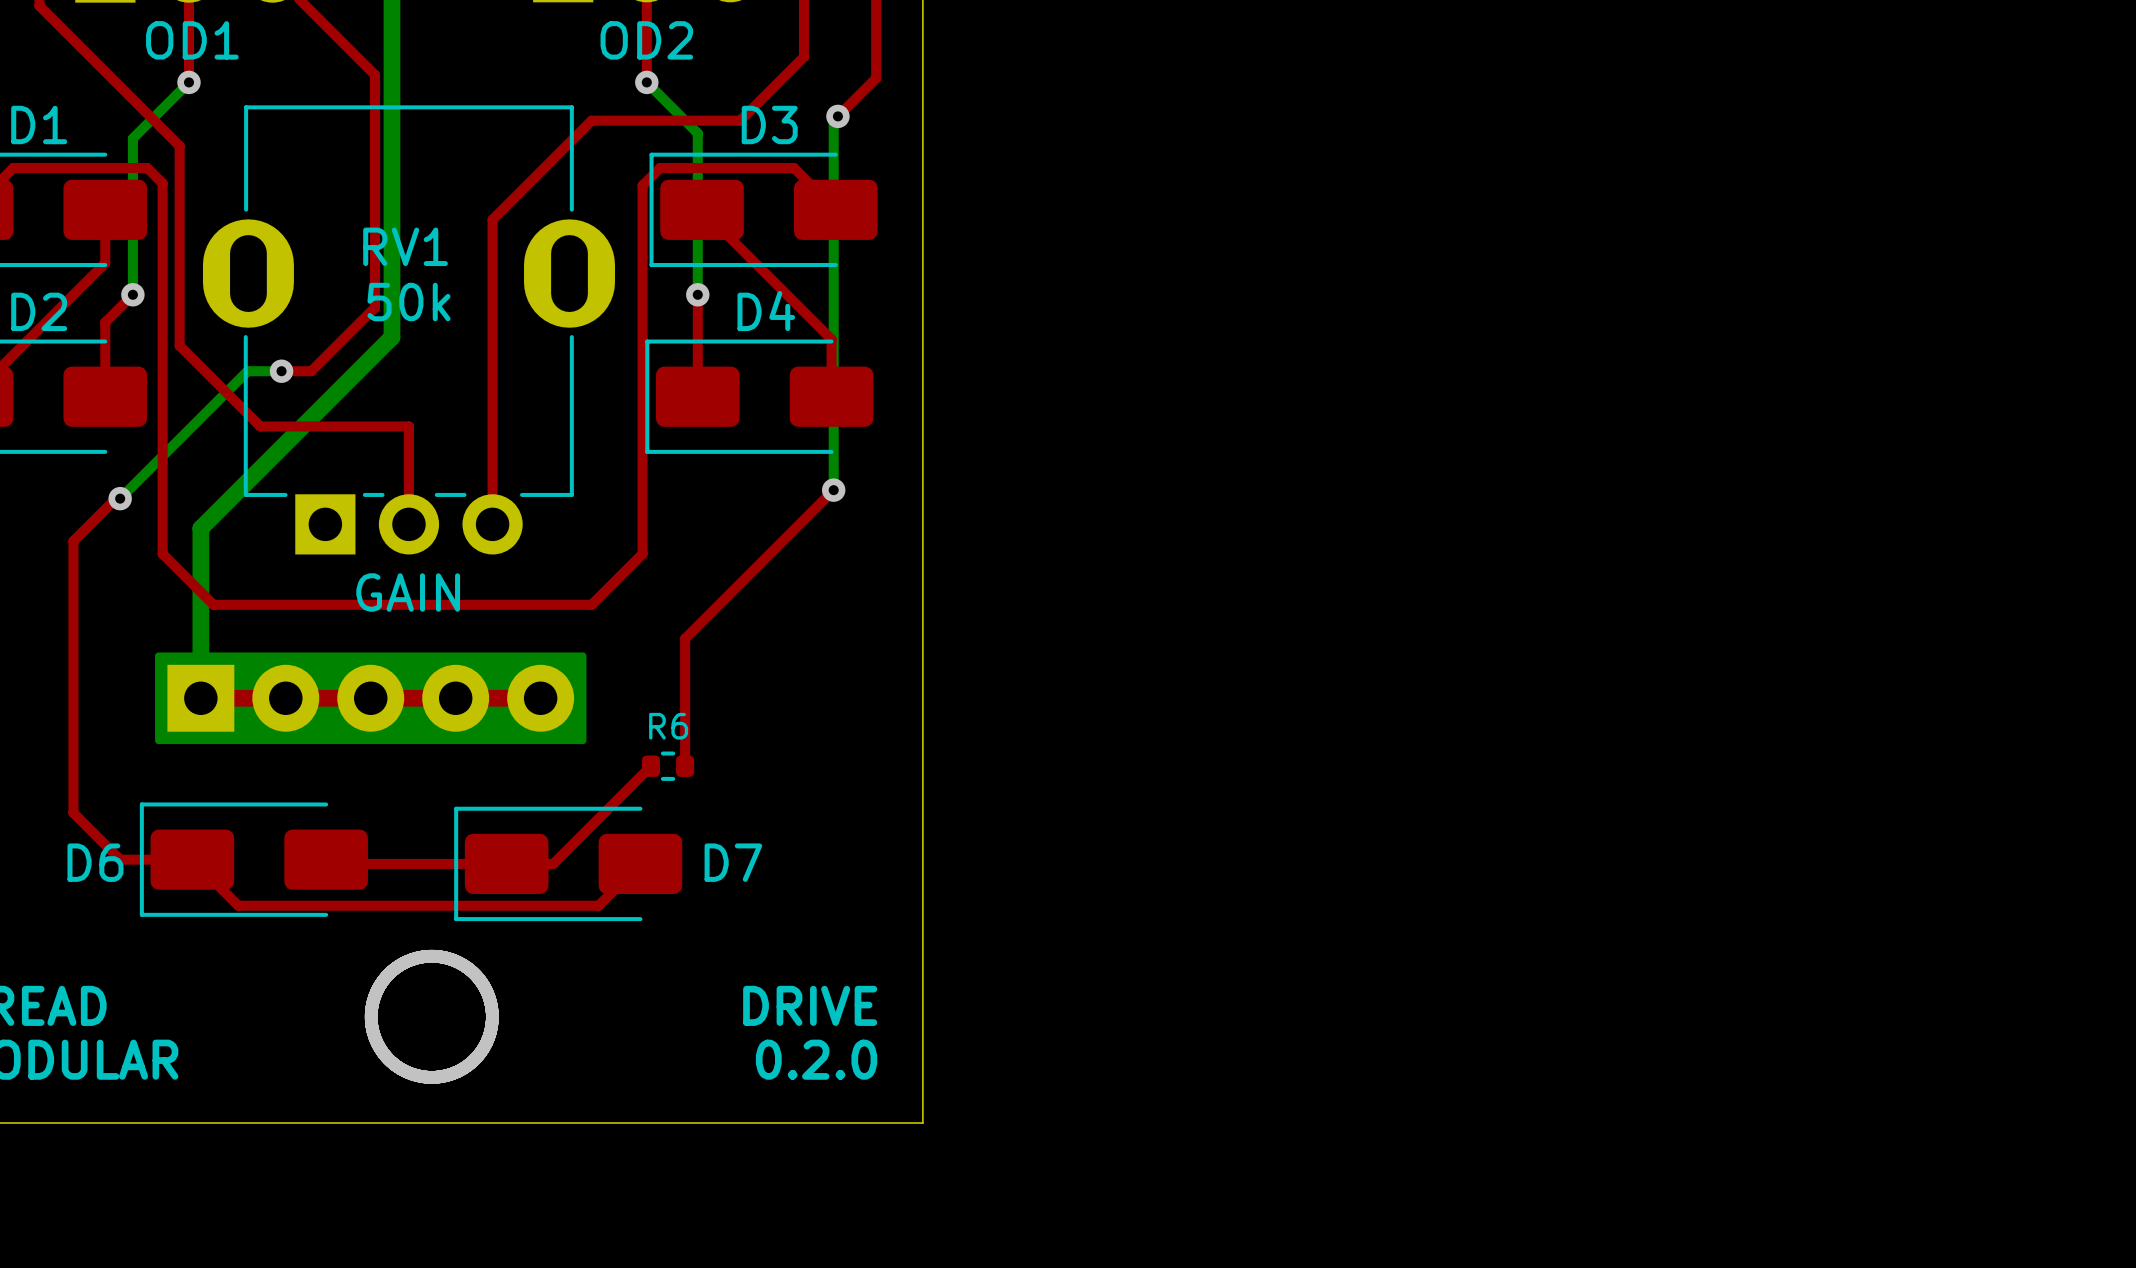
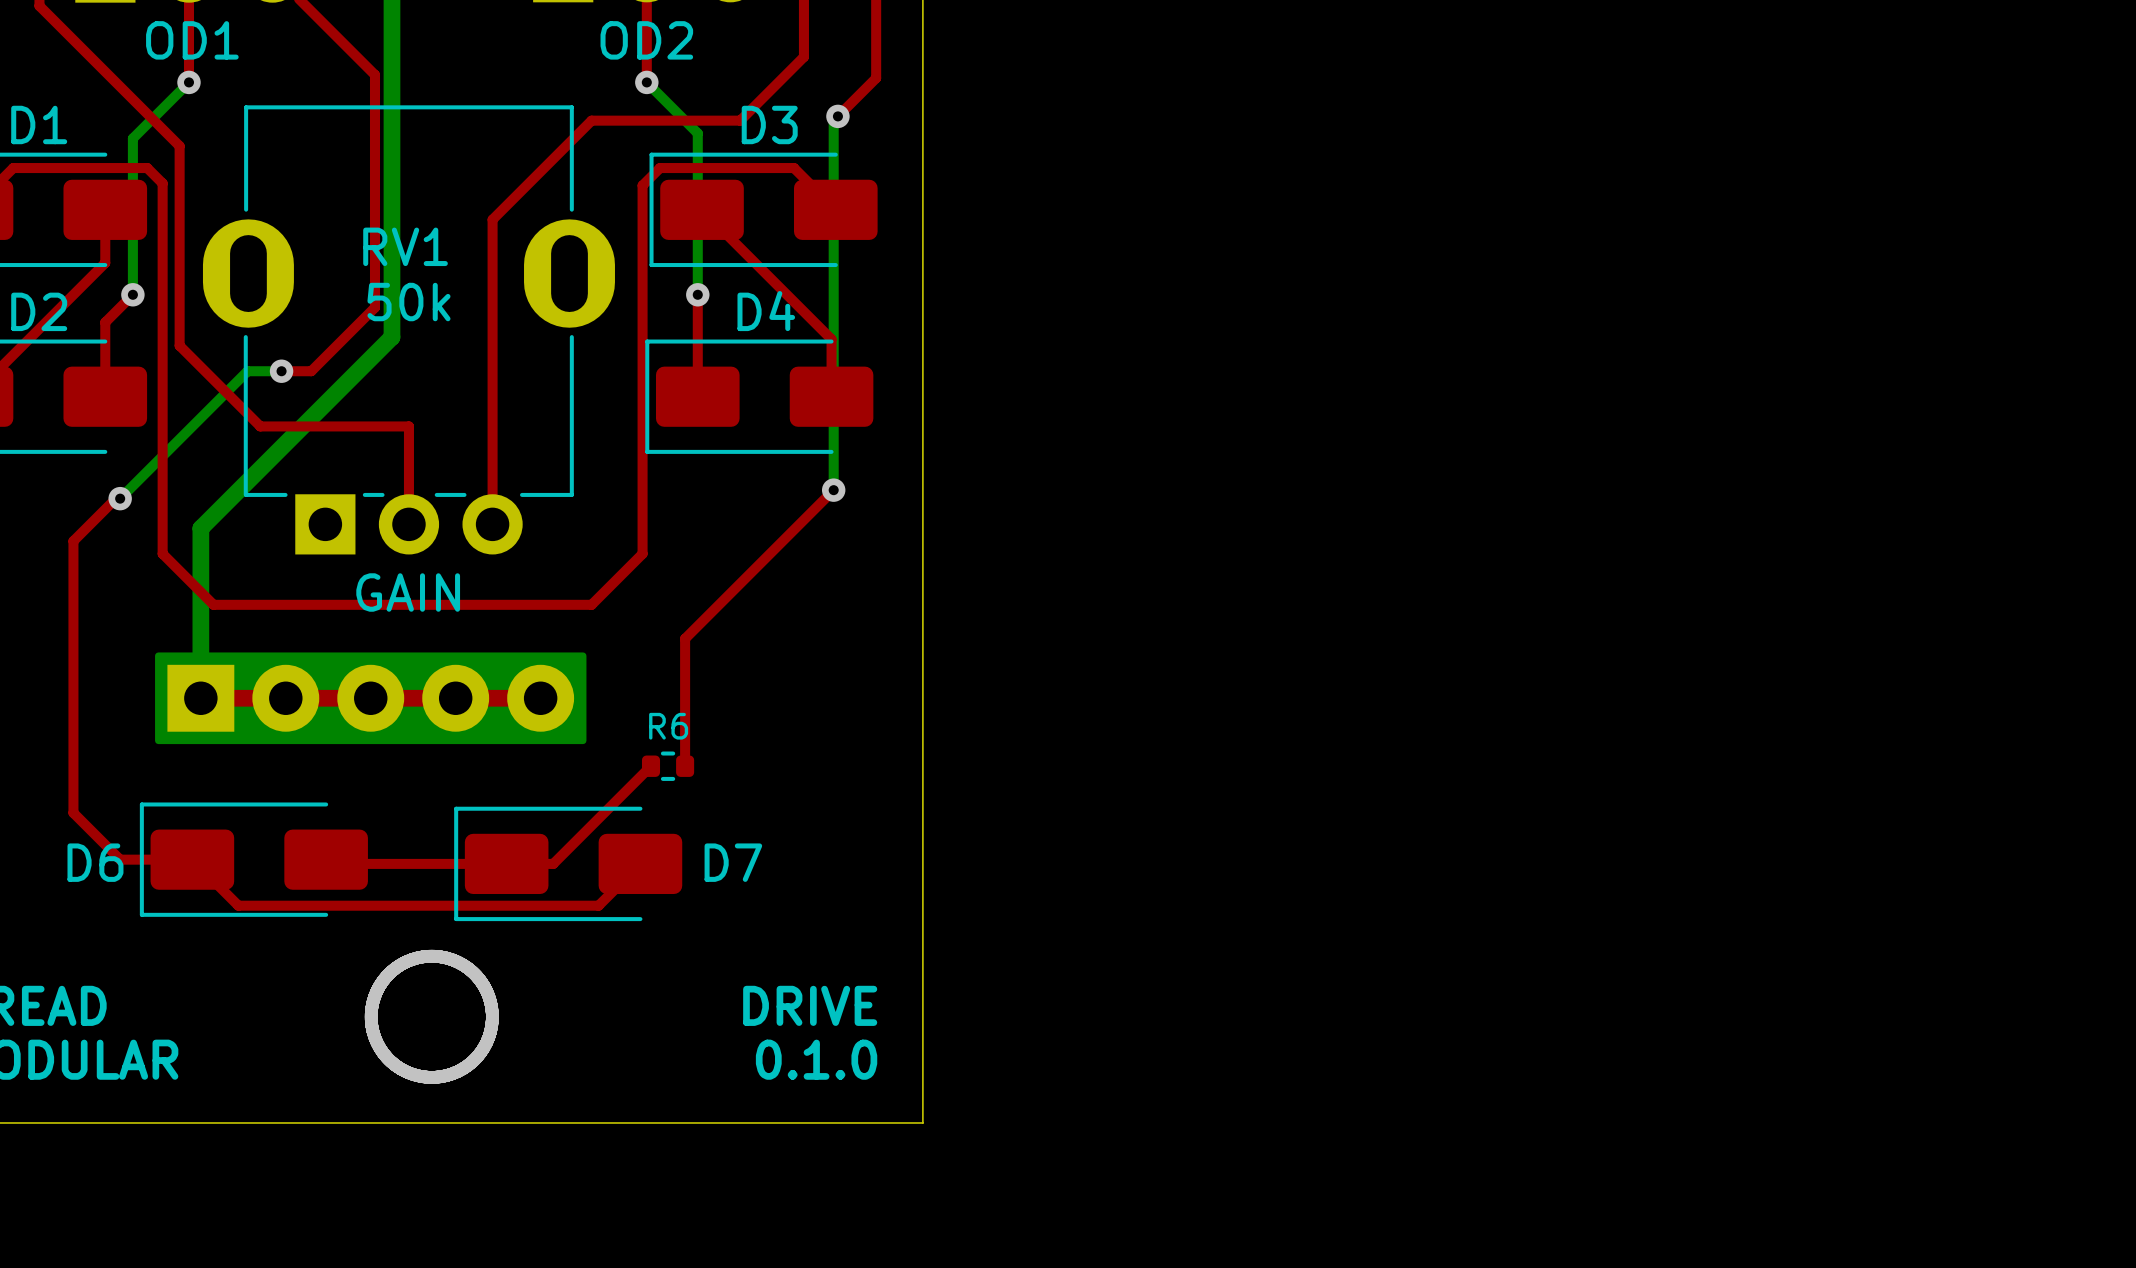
text: 0.2.0 (816, 1059) -> 0.1.0 (816, 1059)

